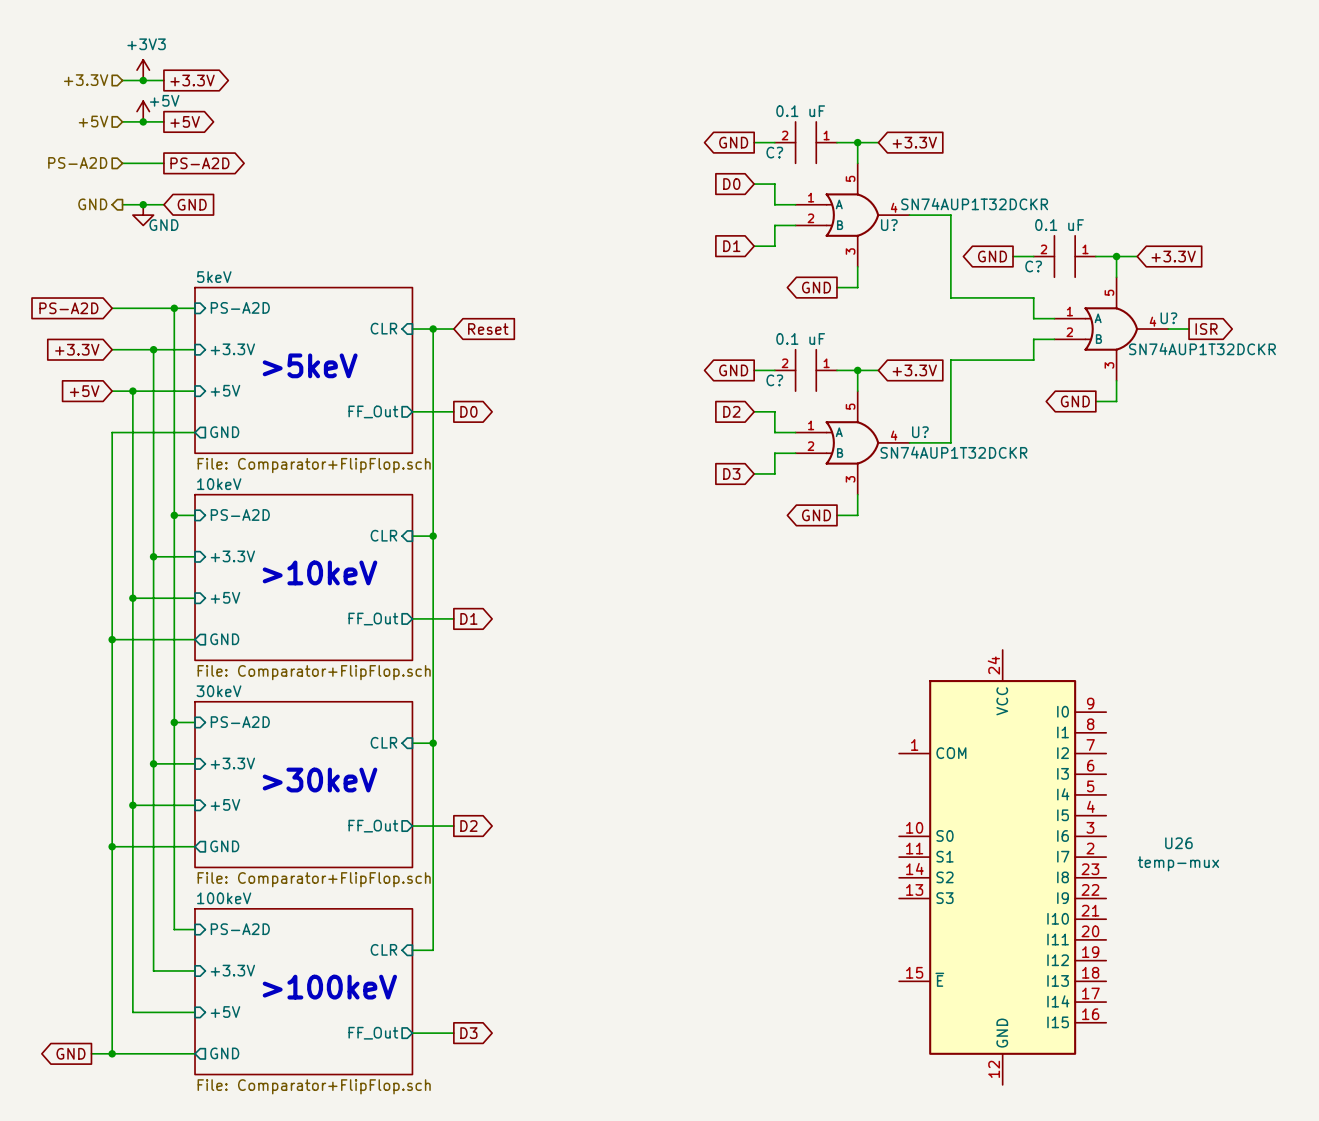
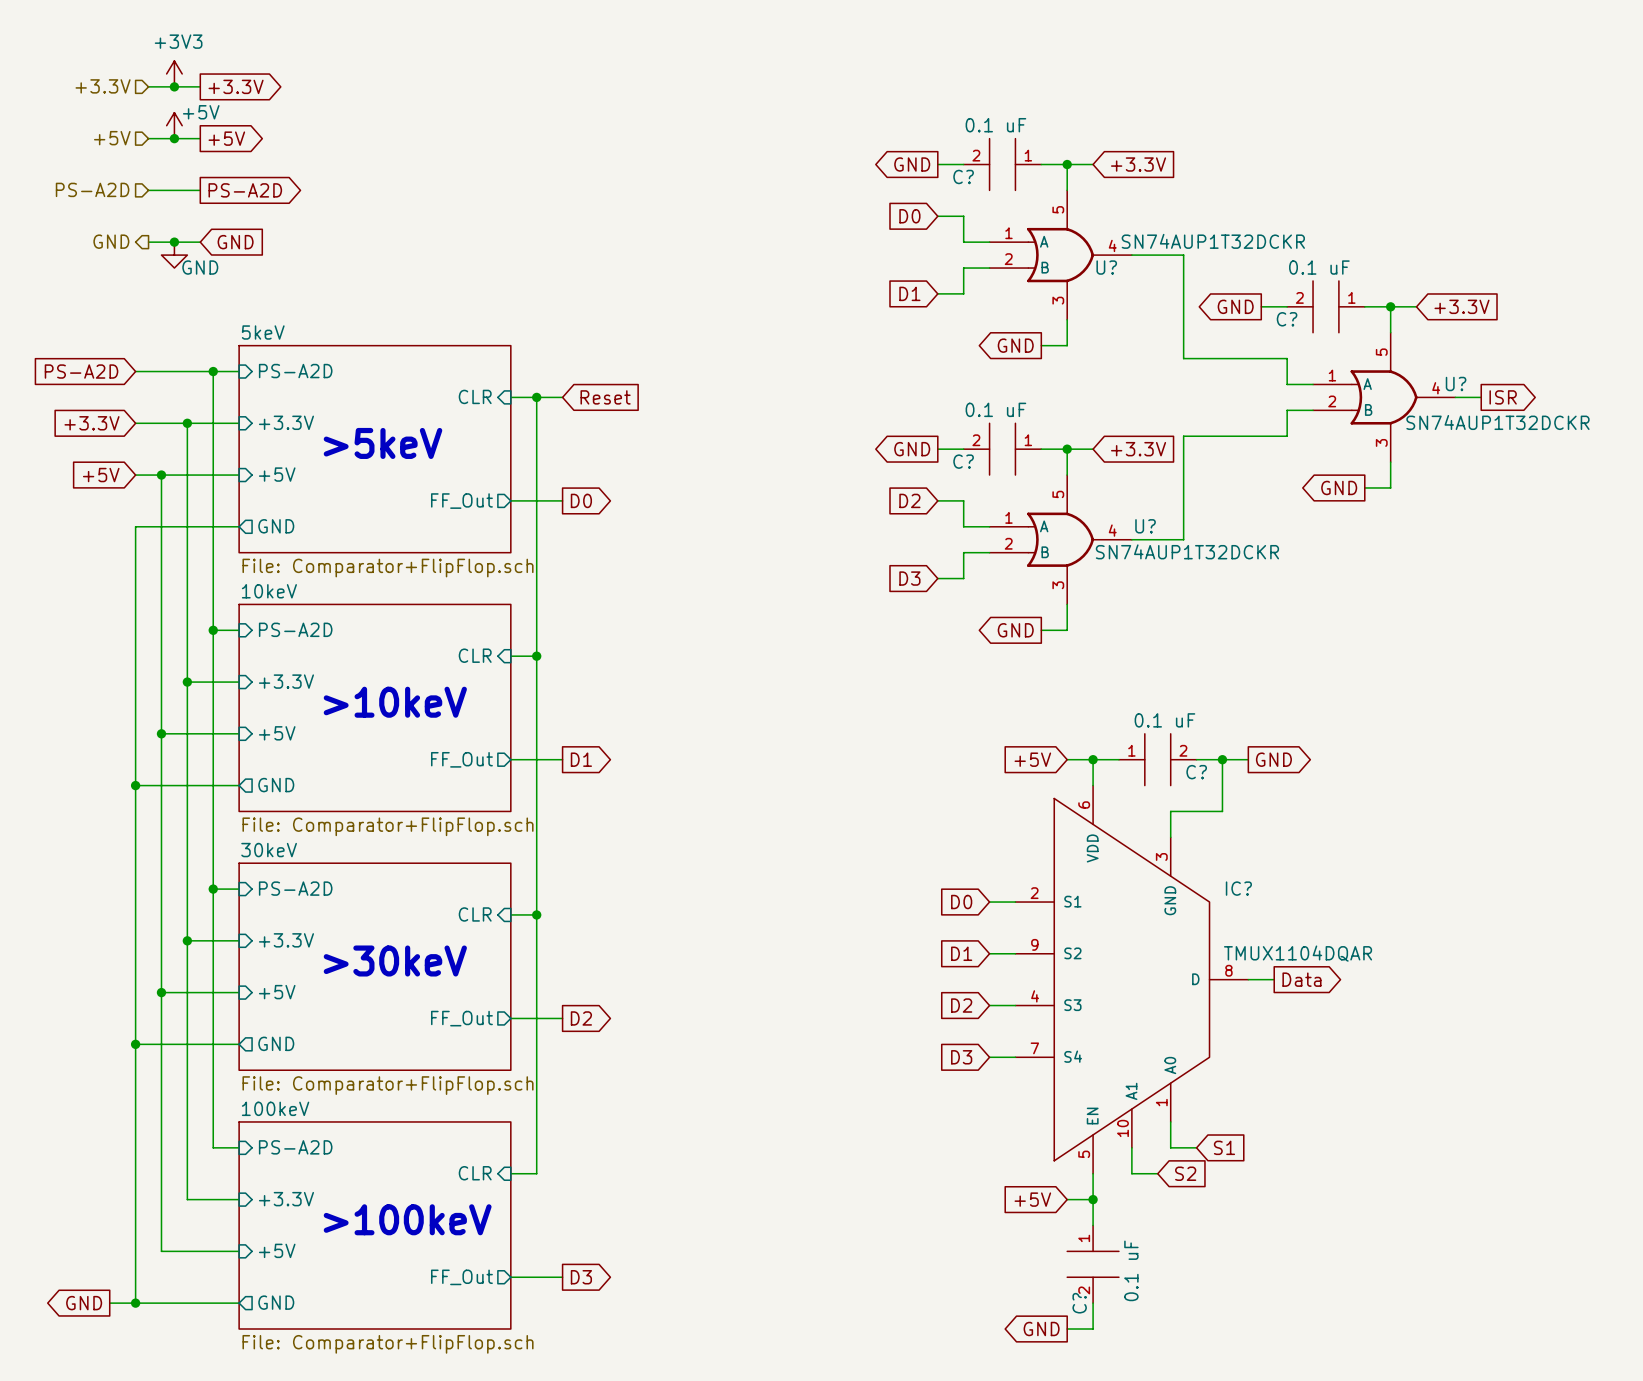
global label: none -> +5V (1032, 759)
wire: none -> (1067, 759) (1118, 759)
wire: none -> (1093, 759) (1093, 785)
junction: none -> (1093, 759)
C?: none -> 0.1 uF (1157, 759)
wire: none -> (1196, 759) (1248, 759)
wire: none -> (1222, 759) (1222, 811) (1170, 811) (1170, 837)
junction: none -> (1222, 759)
global label: none -> GND (1273, 759)
global label: none -> D0 (961, 902)
wire: none -> (989, 902) (1015, 902)
global label: none -> D1 (961, 953)
wire: none -> (989, 953) (1015, 953)
IC?: none -> TMUX1104DQAR (1131, 979)
global label: none -> Data (1301, 979)
global label: none -> D2 (961, 1005)
wire: none -> (989, 1005) (1015, 1005)
global label: none -> D3 (961, 1057)
wire: none -> (989, 1057) (1015, 1057)
U26: temp-mux (1002, 867) -> none
wire: none -> (1131, 1147) (1131, 1173) (1157, 1173)
global label: none -> S1 (1224, 1147)
wire: none -> (1093, 1173) (1093, 1225)
global label: none -> S2 (1185, 1173)
global label: none -> +5V (1032, 1199)
wire: none -> (1067, 1199) (1093, 1199)
junction: none -> (1093, 1199)
C?: none -> 0.1 uF (1093, 1264)
wire: none -> (1093, 1303) (1093, 1329) (1067, 1329)
global label: none -> GND (1041, 1329)

